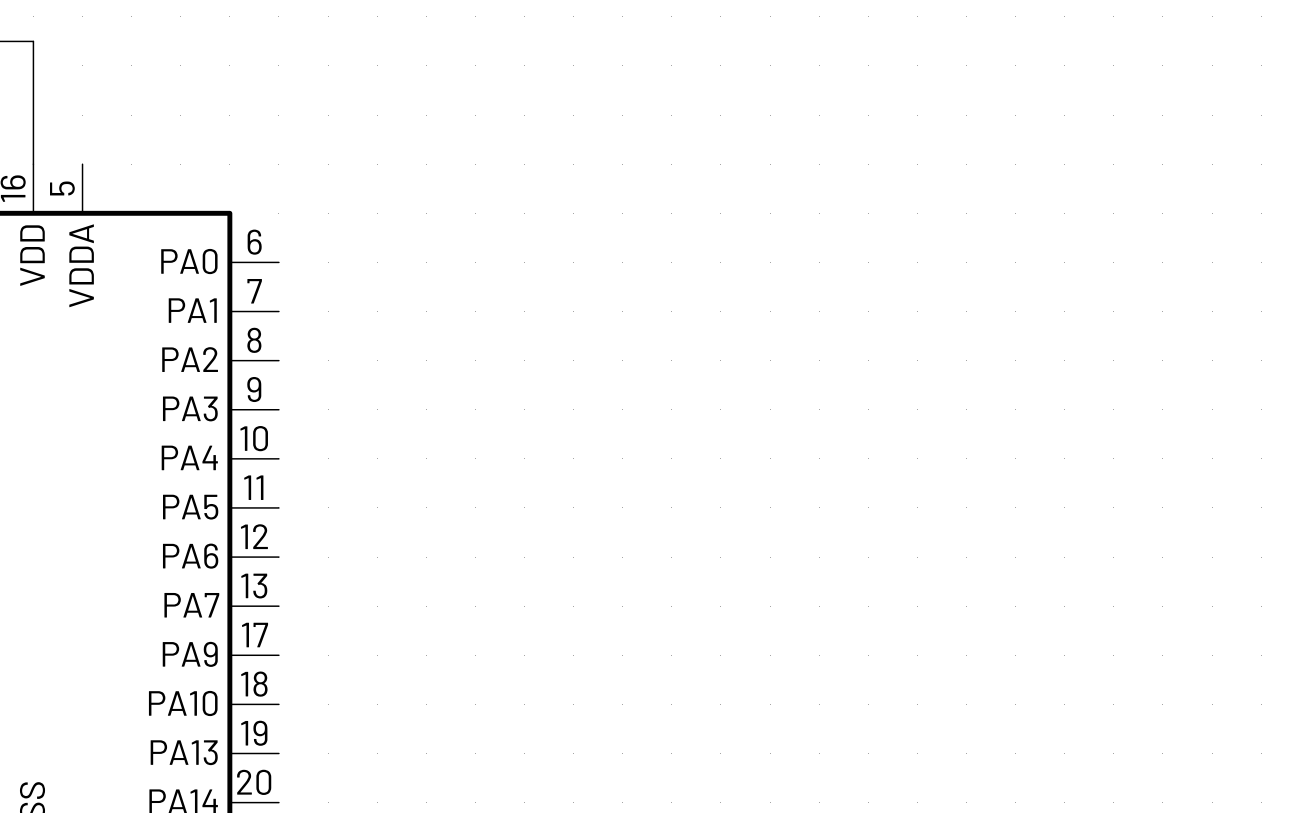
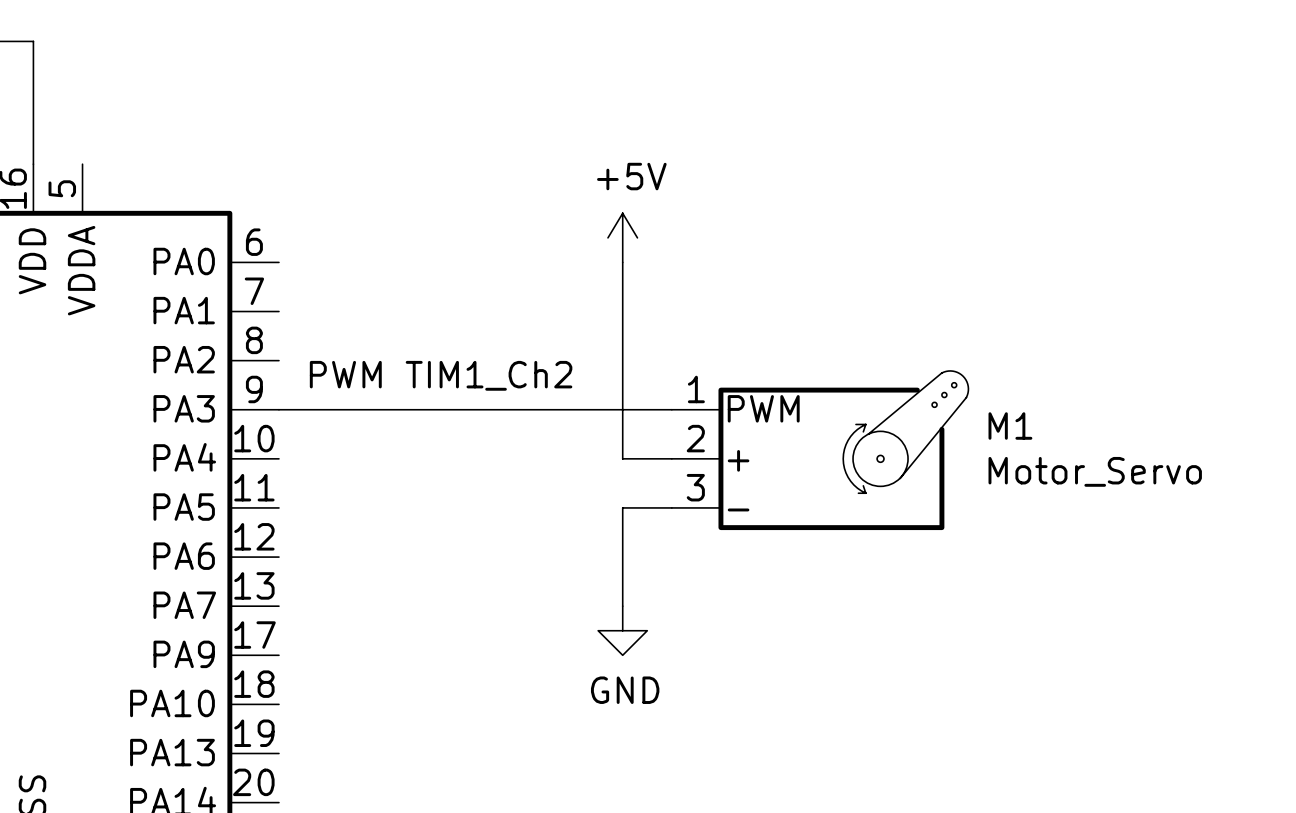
power symbol: none -> +5V (622, 237)
wire: none -> (622, 262) (622, 458) (671, 458)
text: none -> PWM TIM1_Ch2 (441, 375)
wire: none -> (278, 409) (671, 409)
M1: none -> Motor_Servo (820, 450)
wire: none -> (671, 507) (622, 507) (622, 606)
power symbol: none -> GND (622, 630)

